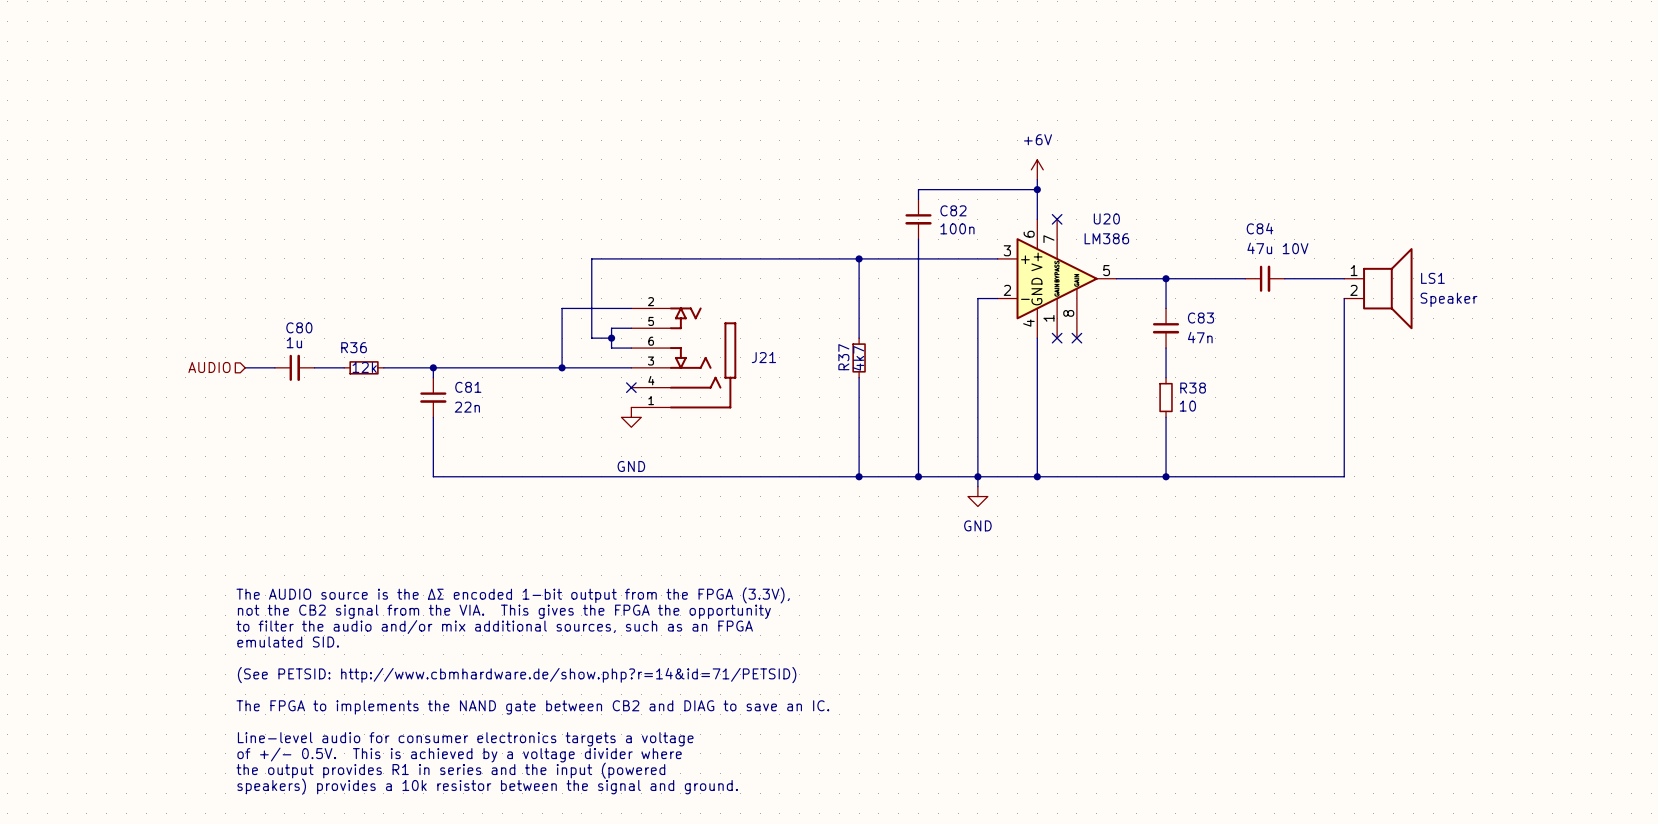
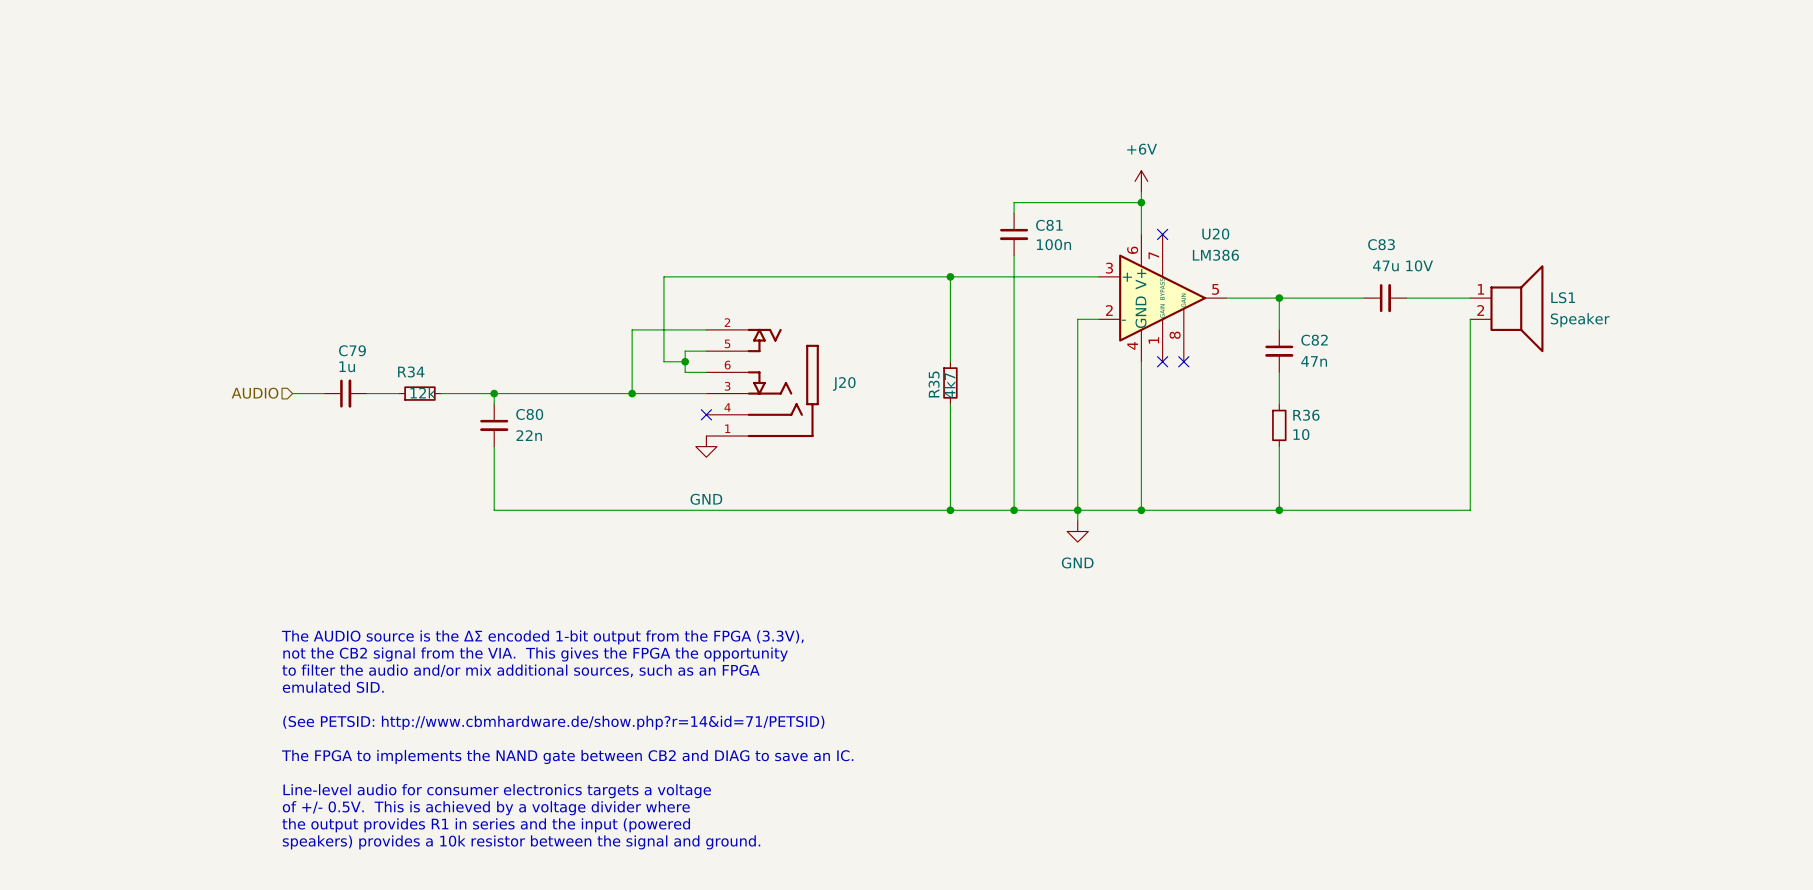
C82 name: C82 (953, 210) -> C81 (1049, 225)
C84 name: C84 (1260, 228) -> C83 (1381, 244)
C83 name: C83 (1200, 318) -> C82 (1314, 340)
C80 name: C80 (299, 327) -> C79 (352, 350)
R36 name: R36 (354, 347) -> R34 (411, 371)
J21 name: J21 (763, 357) -> J20 (844, 383)
R37 name: R37 (843, 357) -> R35 (934, 384)
C81 name: C81 (468, 387) -> C80 (529, 414)
R38 name: R38 (1193, 388) -> R36 (1306, 415)

